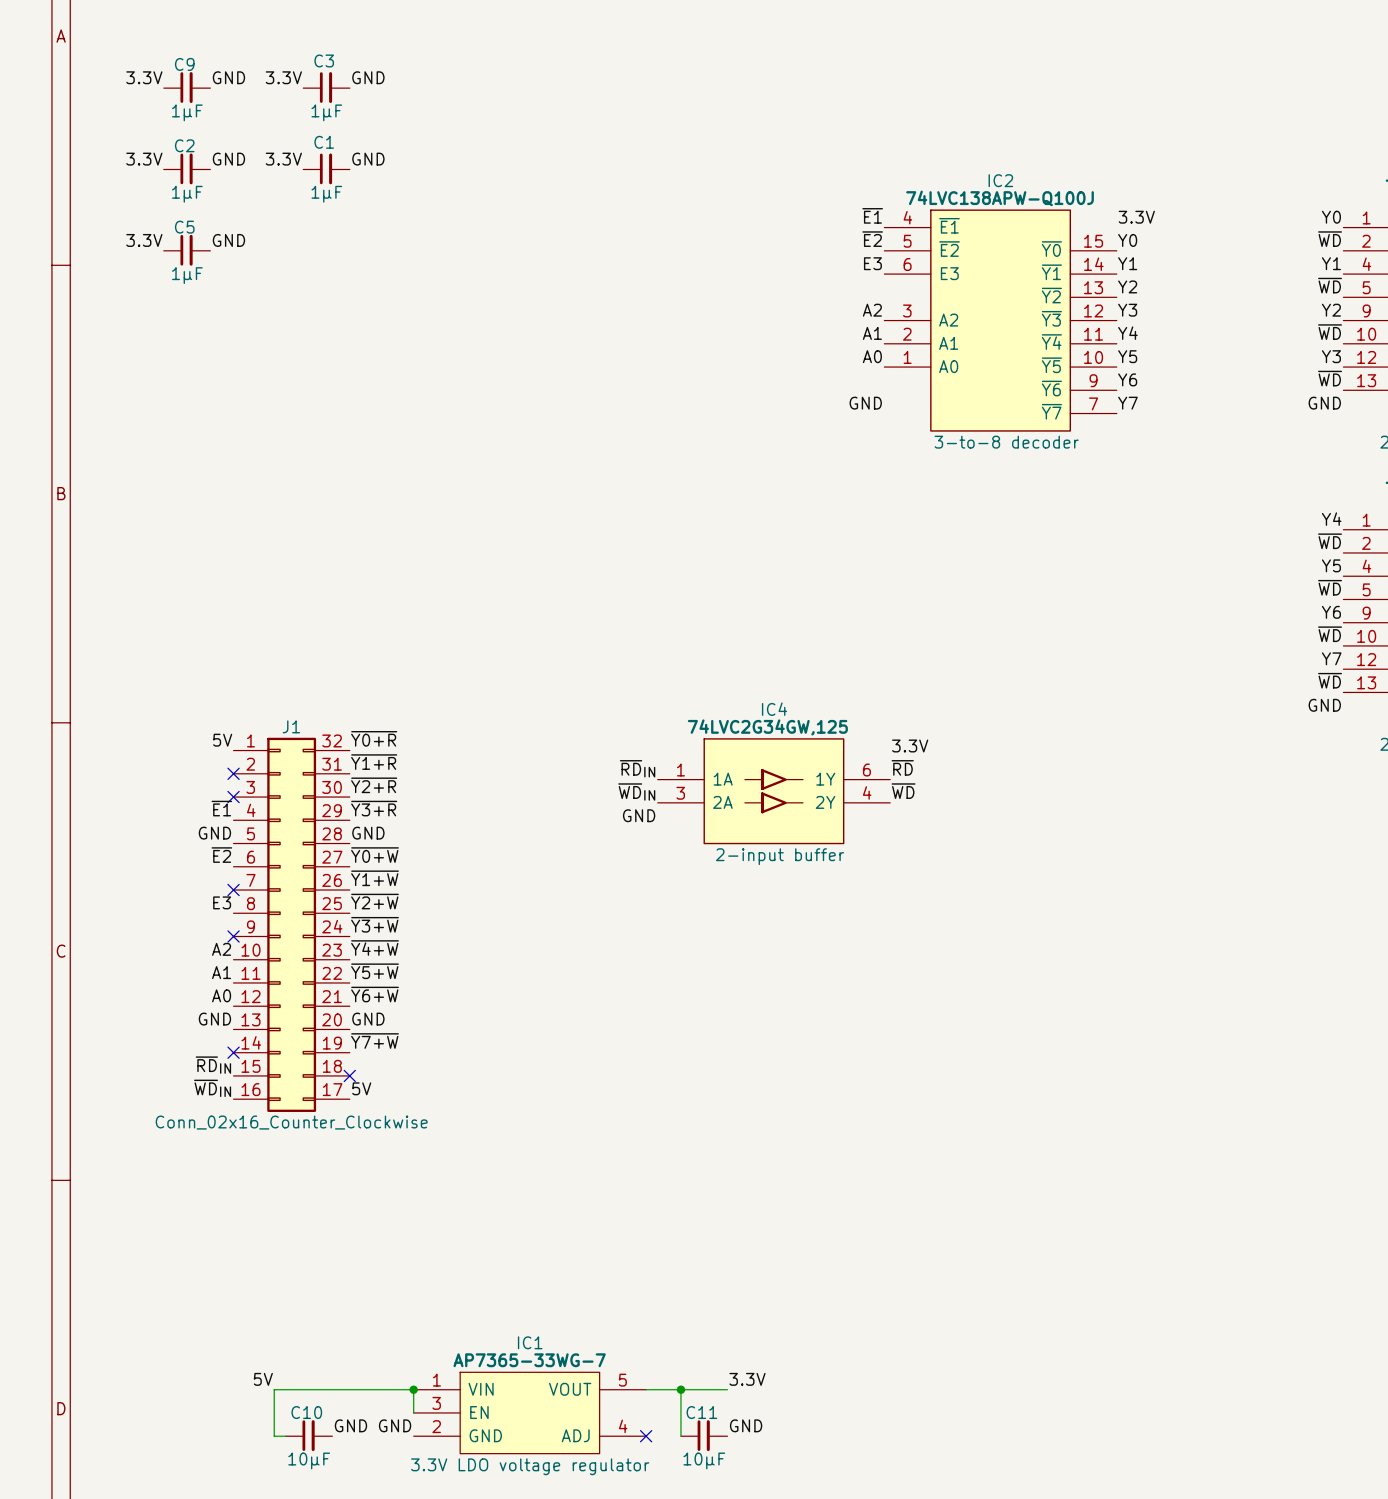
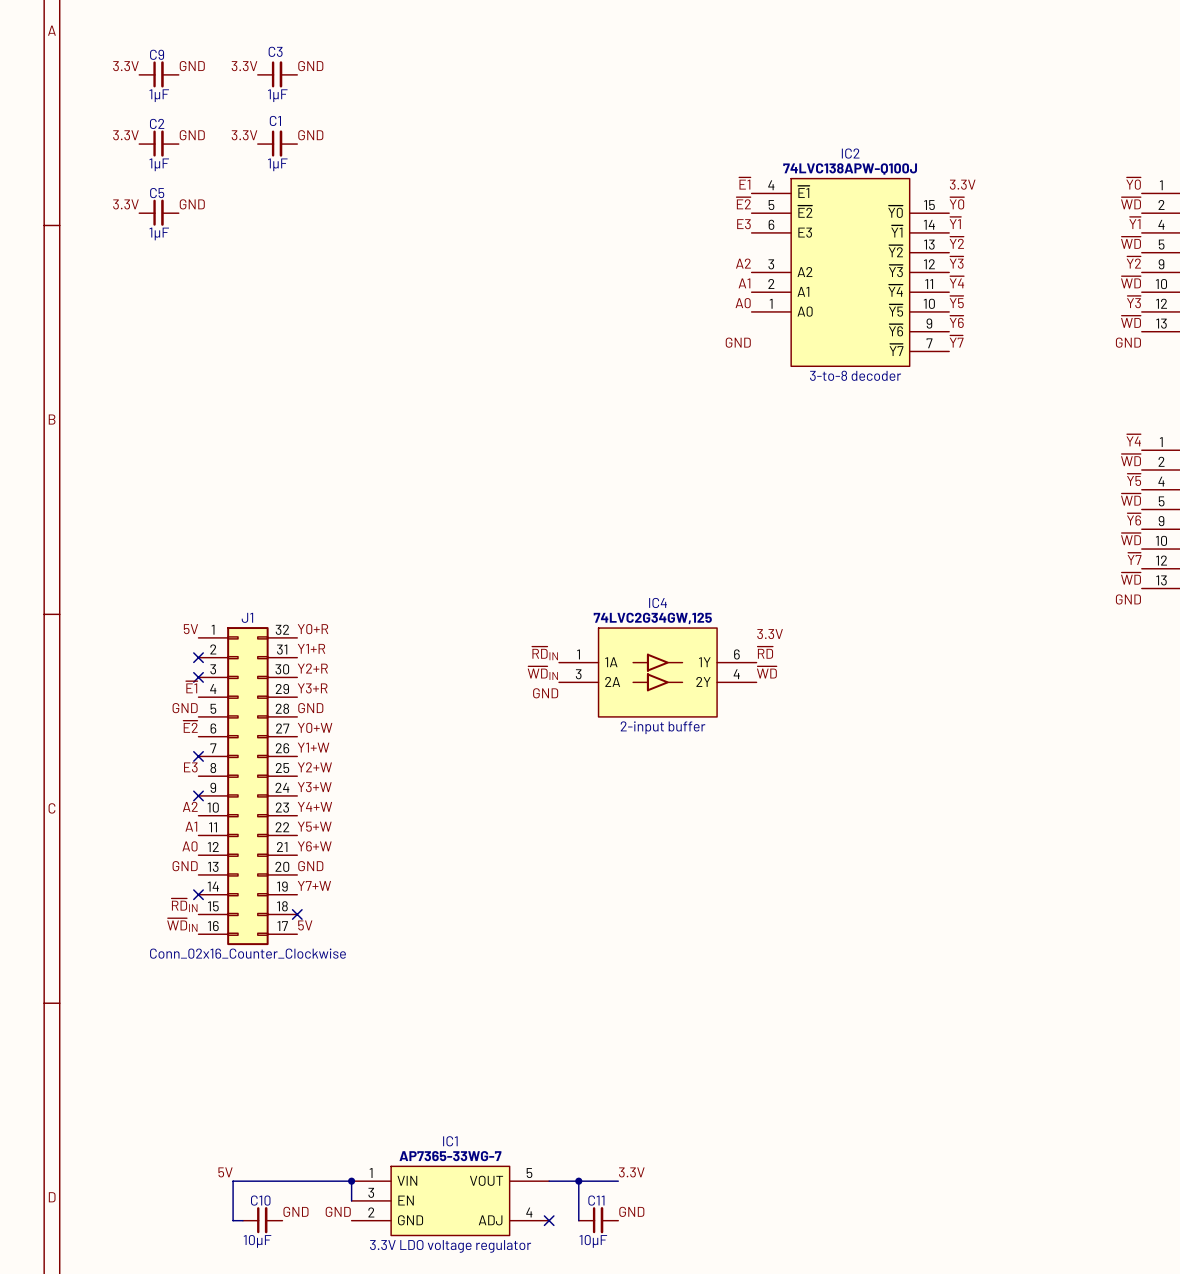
label: Y0 (1331, 217) -> ~{Y0} (1133, 183)
label: Y0 (1127, 240) -> ~{Y0} (956, 203)
label: Y1 (1127, 263) -> ~{Y1} (955, 222)
label: Y1 (1331, 263) -> ~{Y1} (1135, 222)
label: Y2 (1127, 286) -> ~{Y2} (956, 242)
label: Y3 (1127, 310) -> ~{Y3} (956, 262)
label: Y2 (1331, 310) -> ~{Y2} (1133, 262)
label: Y4 (1127, 333) -> ~{Y4} (956, 282)
label: Y5 (1127, 356) -> ~{Y5} (956, 302)
label: Y3 (1331, 356) -> ~{Y3} (1133, 302)
label: Y6 (1127, 379) -> ~{Y6} (956, 321)
label: Y7 (1127, 403) -> ~{Y7} (956, 341)
label: Y4 (1331, 519) -> ~{Y4} (1133, 440)
label: Y5 (1331, 565) -> ~{Y5} (1134, 479)
label: Y6 (1331, 612) -> ~{Y6} (1134, 519)
label: Y7 (1331, 658) -> ~{Y7} (1134, 558)
label: ~{Y0+R} (374, 738) -> Y0+R (313, 629)
label: ~{Y1+R} (374, 762) -> Y1+R (311, 648)
label: ~{Y2+R} (374, 785) -> Y2+R (312, 668)
label: ~{Y3+R} (374, 808) -> Y3+R (312, 688)
label: ~{Y0+W} (375, 855) -> Y0+W (315, 727)
label: ~{Y1+W} (375, 878) -> Y1+W (313, 747)
label: ~{Y2+W} (375, 901) -> Y2+W (314, 767)
label: ~{Y3+W} (375, 924) -> Y3+W (314, 787)
label: ~{Y4+W} (375, 948) -> Y4+W (314, 806)
label: ~{Y5+W} (375, 971) -> Y5+W (314, 826)
label: ~{Y6+W} (375, 994) -> Y6+W (314, 846)
label: ~{Y7+W} (375, 1041) -> Y7+W (314, 885)

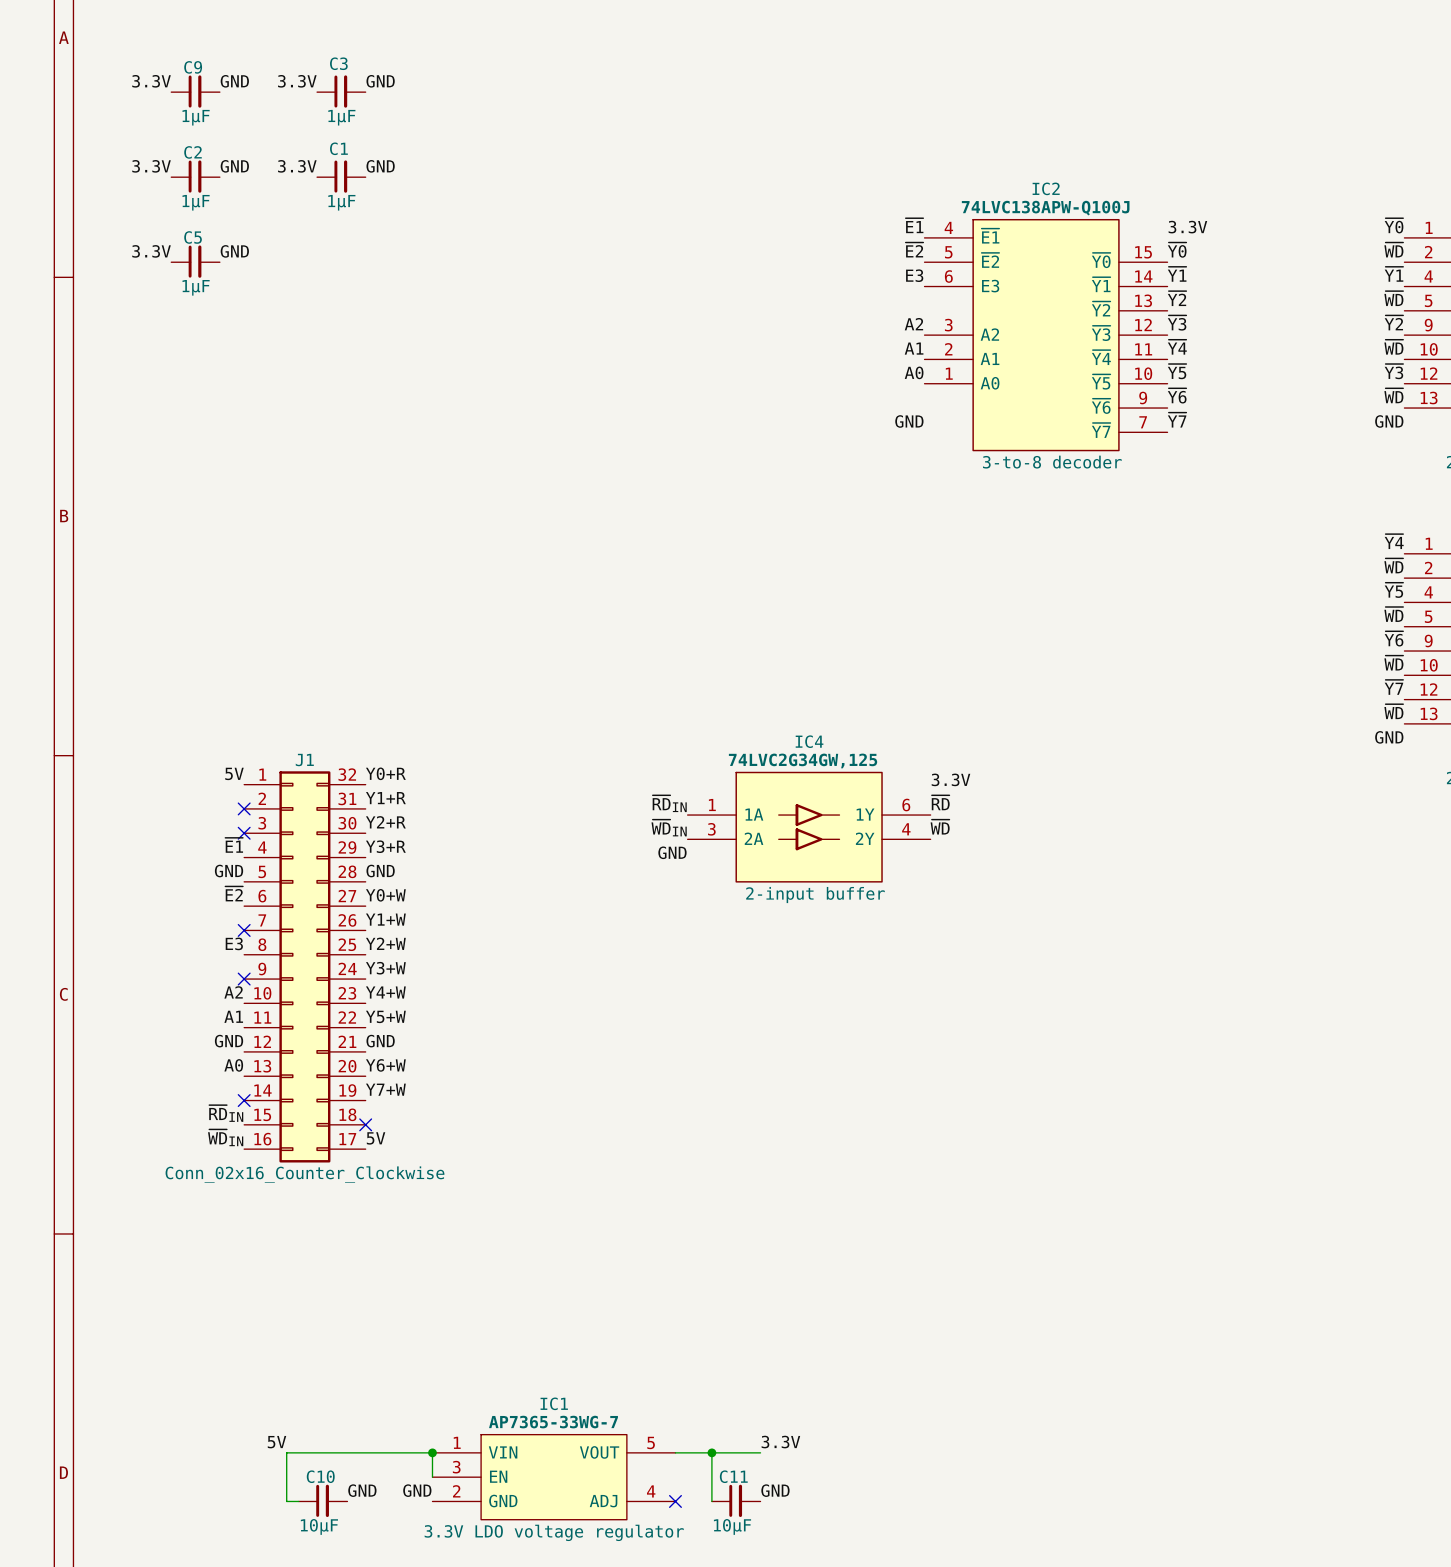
label: A0 (189, 846) -> GND (229, 1041)
label: Y6+W (314, 846) -> GND (380, 1041)
label: GND (185, 866) -> A0 (233, 1065)
label: GND (310, 866) -> Y6+W (385, 1065)

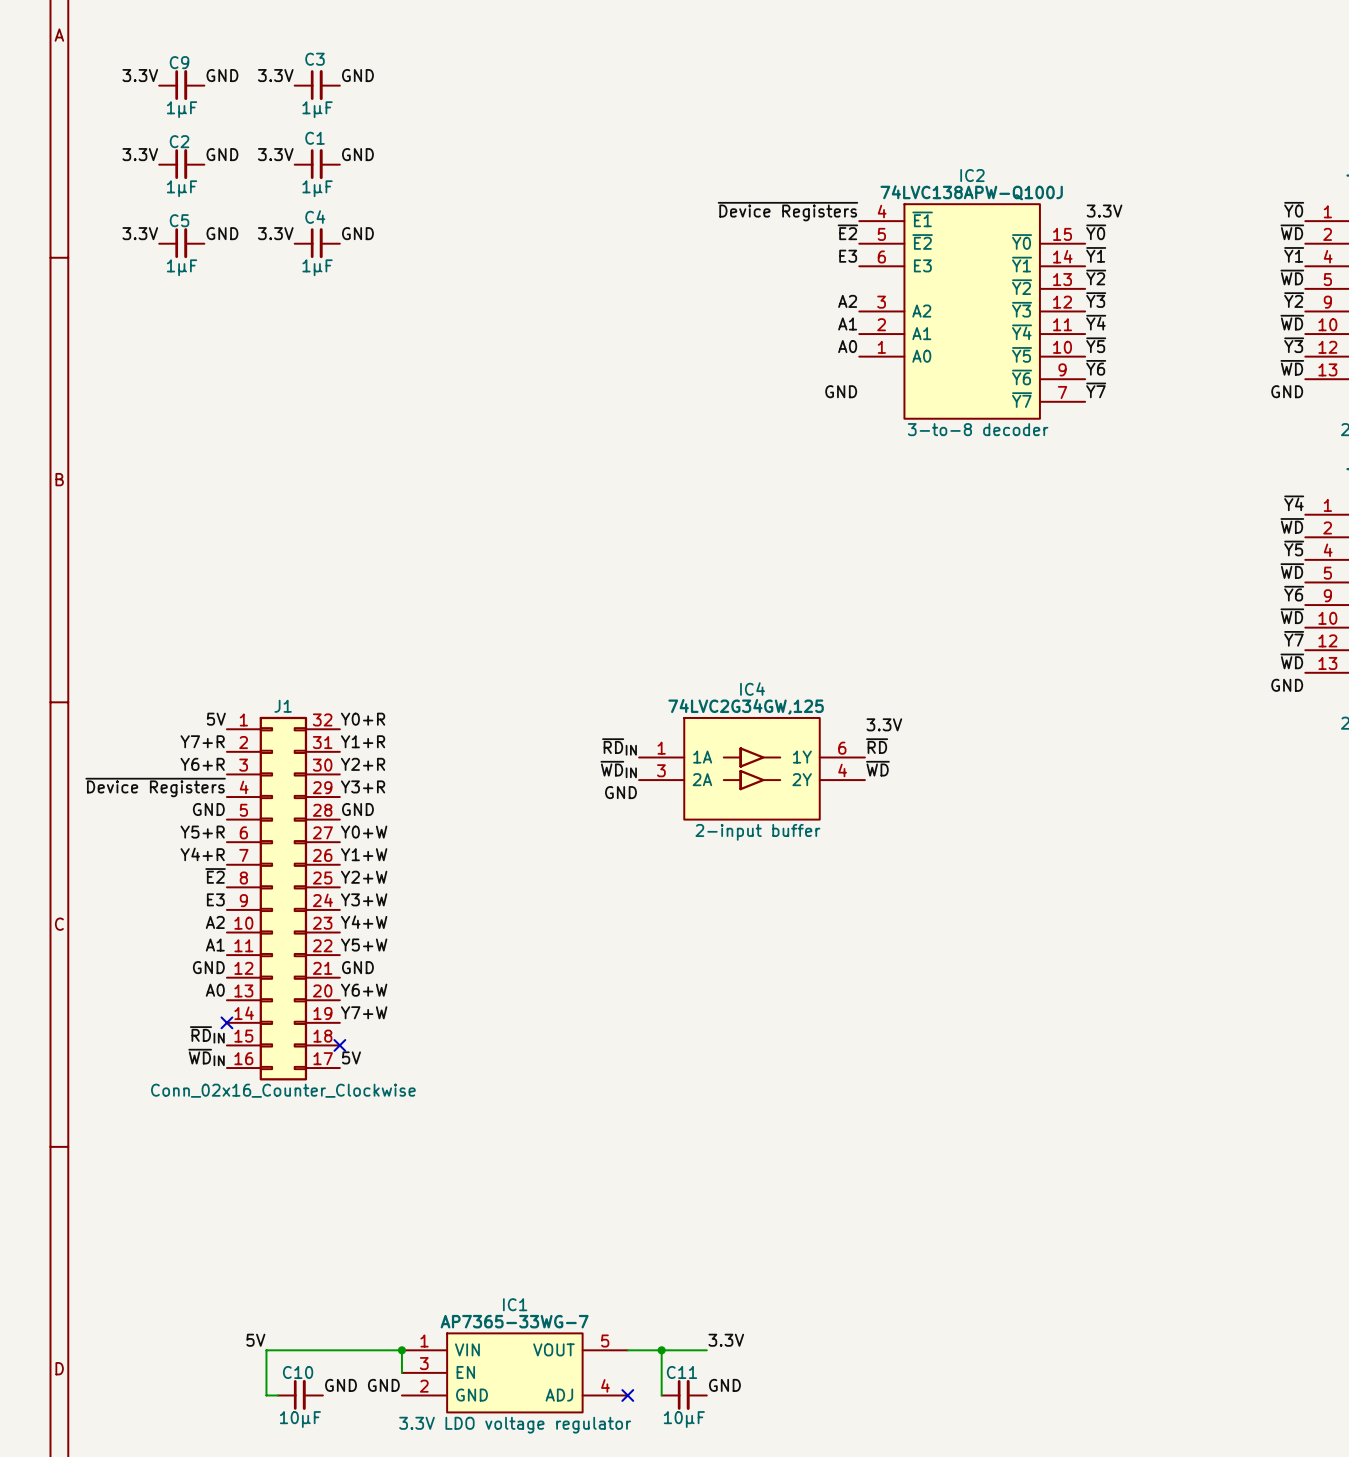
label: ~{E1} (914, 225) -> ~{Device Registers} (787, 211)
label: none -> 3.3V (275, 233)
label: none -> GND (357, 233)
C4: none -> 1μF (317, 243)
label: none -> Y7+R (202, 741)
no-connect mark: (244, 808) -> none
label: none -> Y6+R (202, 764)
no-connect mark: (244, 833) -> none
label: ~{E1} (234, 845) -> ~{Device Registers} (155, 787)
label: ~{E2} (234, 893) -> Y5+R (202, 832)
label: none -> Y4+R (202, 854)
no-connect mark: (244, 930) -> none
label: E3 (234, 943) -> ~{E2} (215, 875)
label: none -> E3 (215, 899)
no-connect mark: (244, 979) -> none

